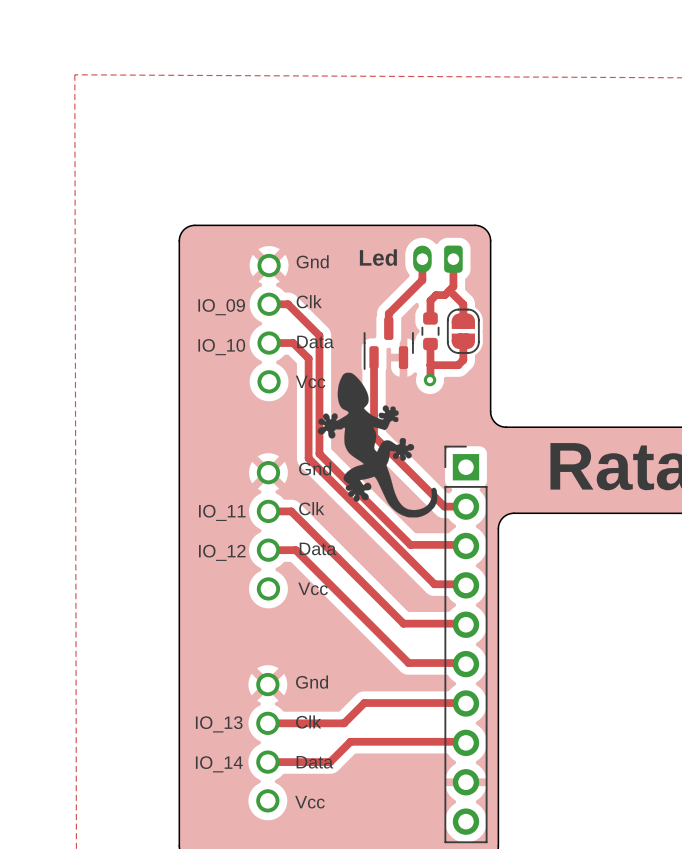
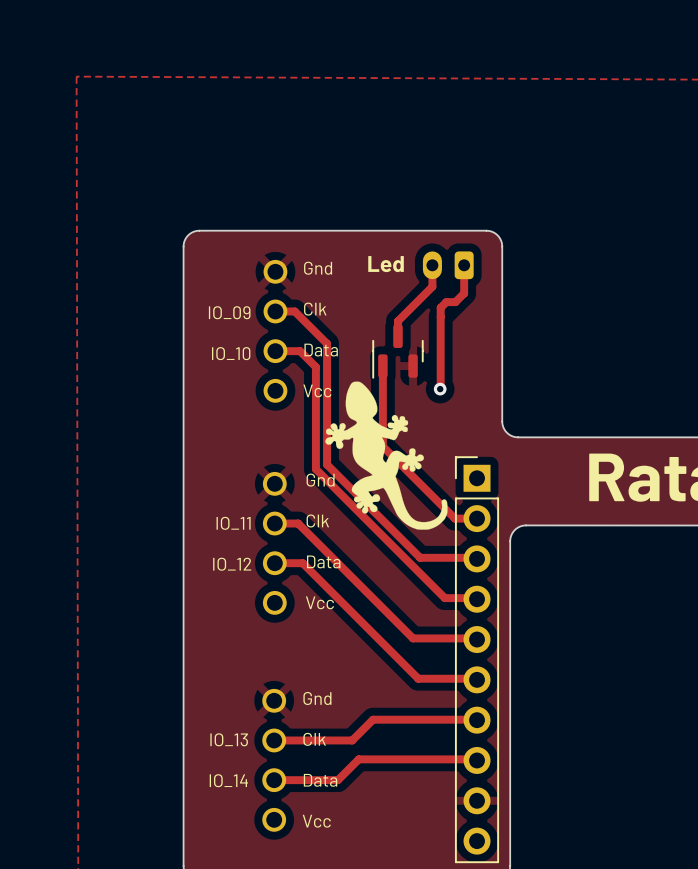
track: (449, 290) (463, 304) (463, 321) -> none
track: none -> (440, 326) (440, 352)
part: (430, 331) -> none
part: (463, 331) -> none
track: (463, 341) (463, 360) (458, 365) (430, 365) -> none

